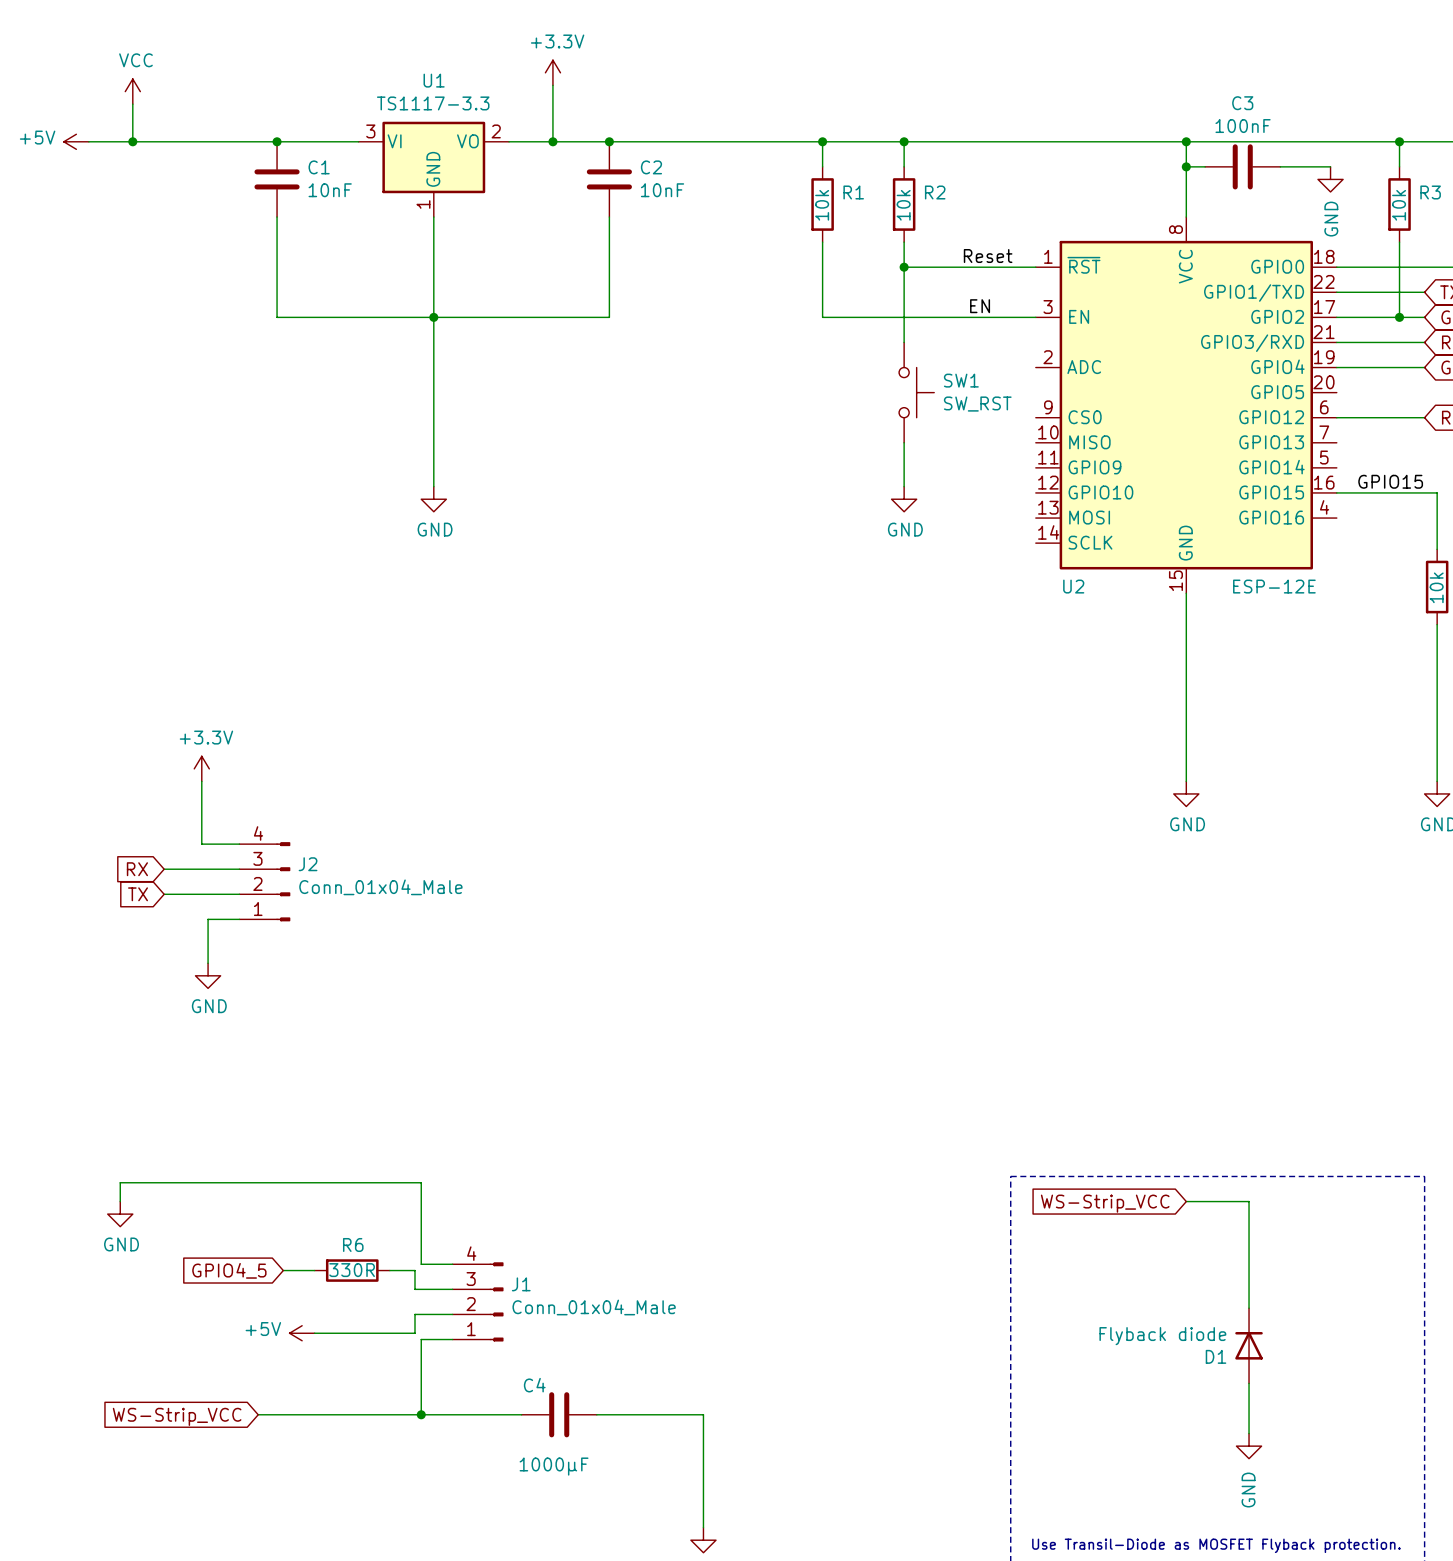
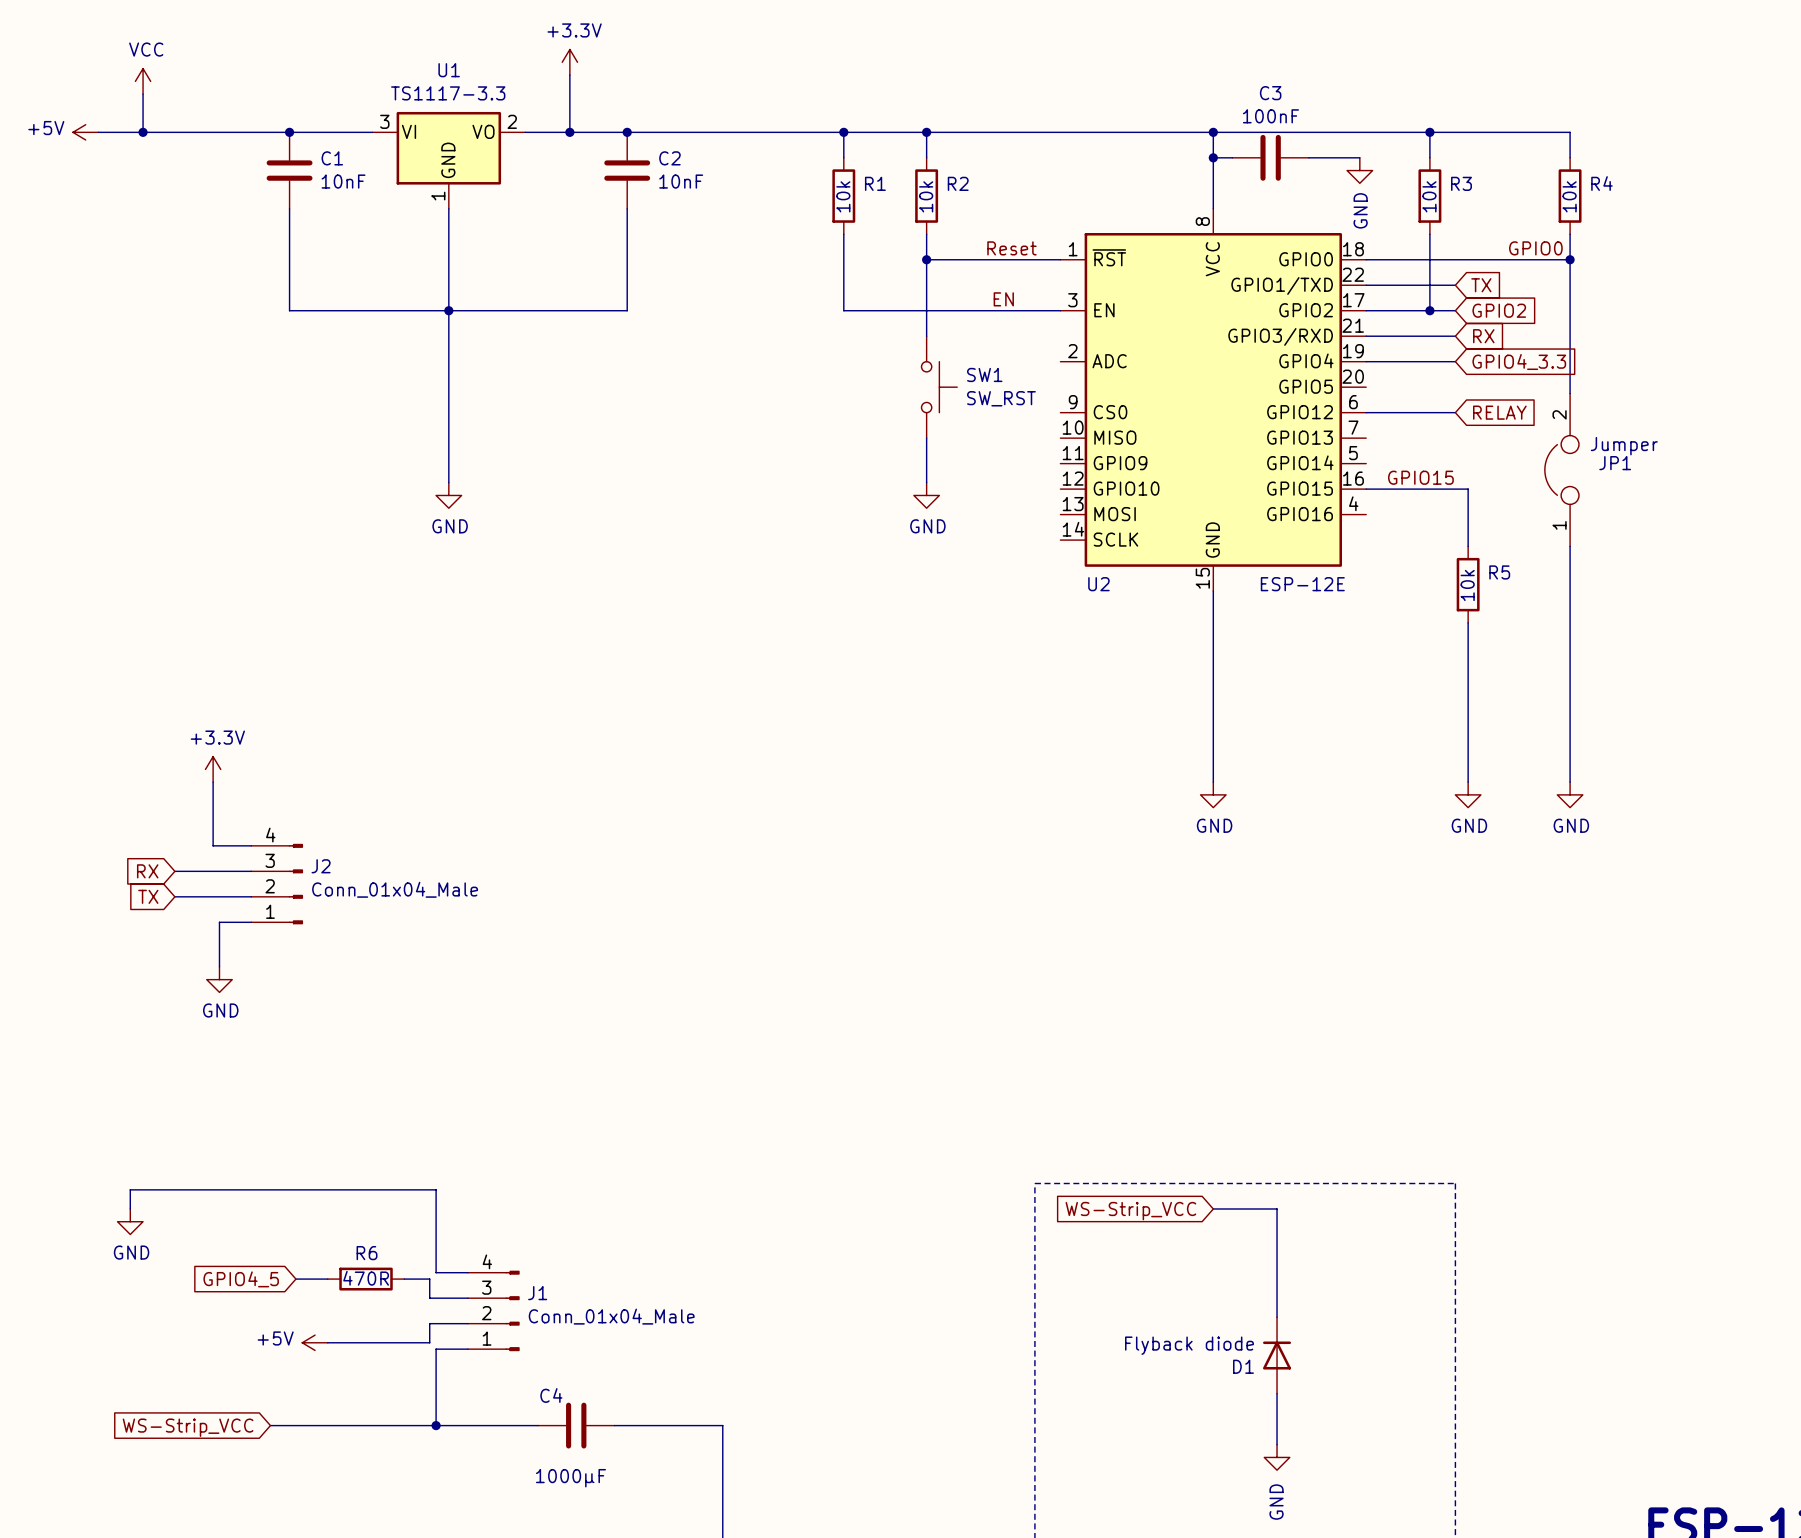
R6 value: 330R (352, 1270) -> 470R (366, 1278)

